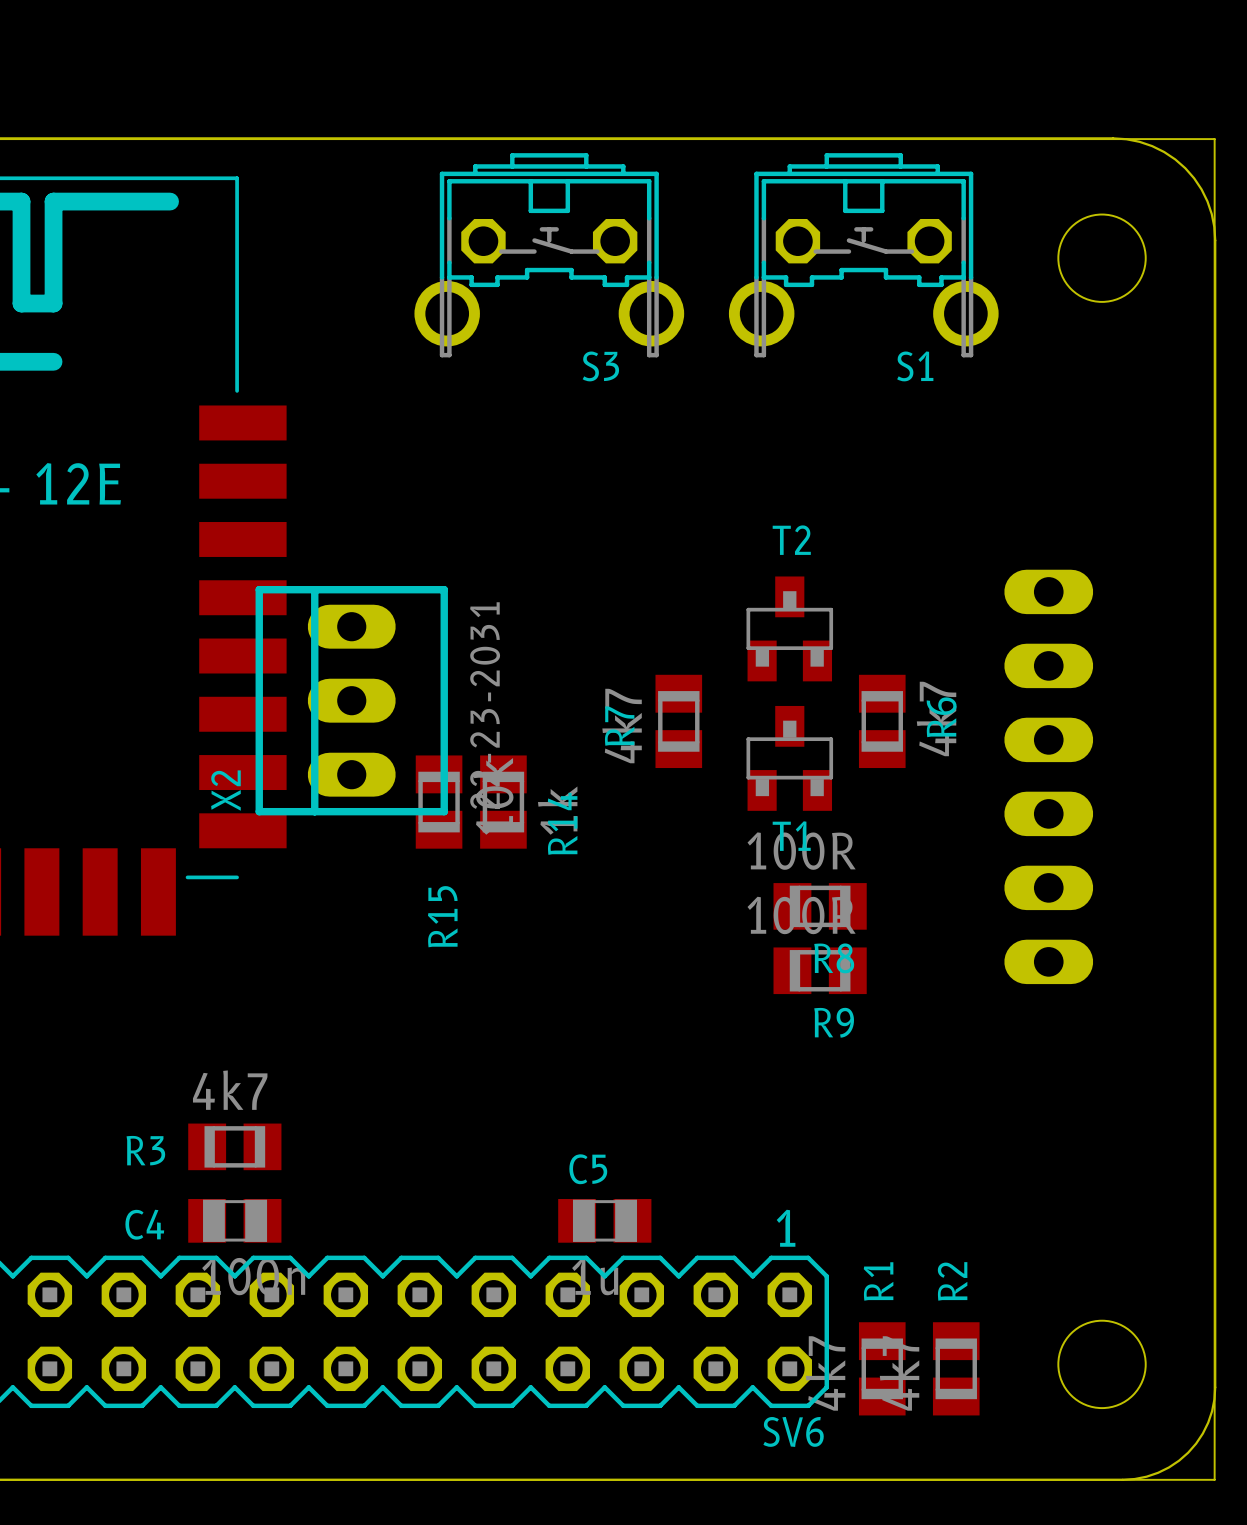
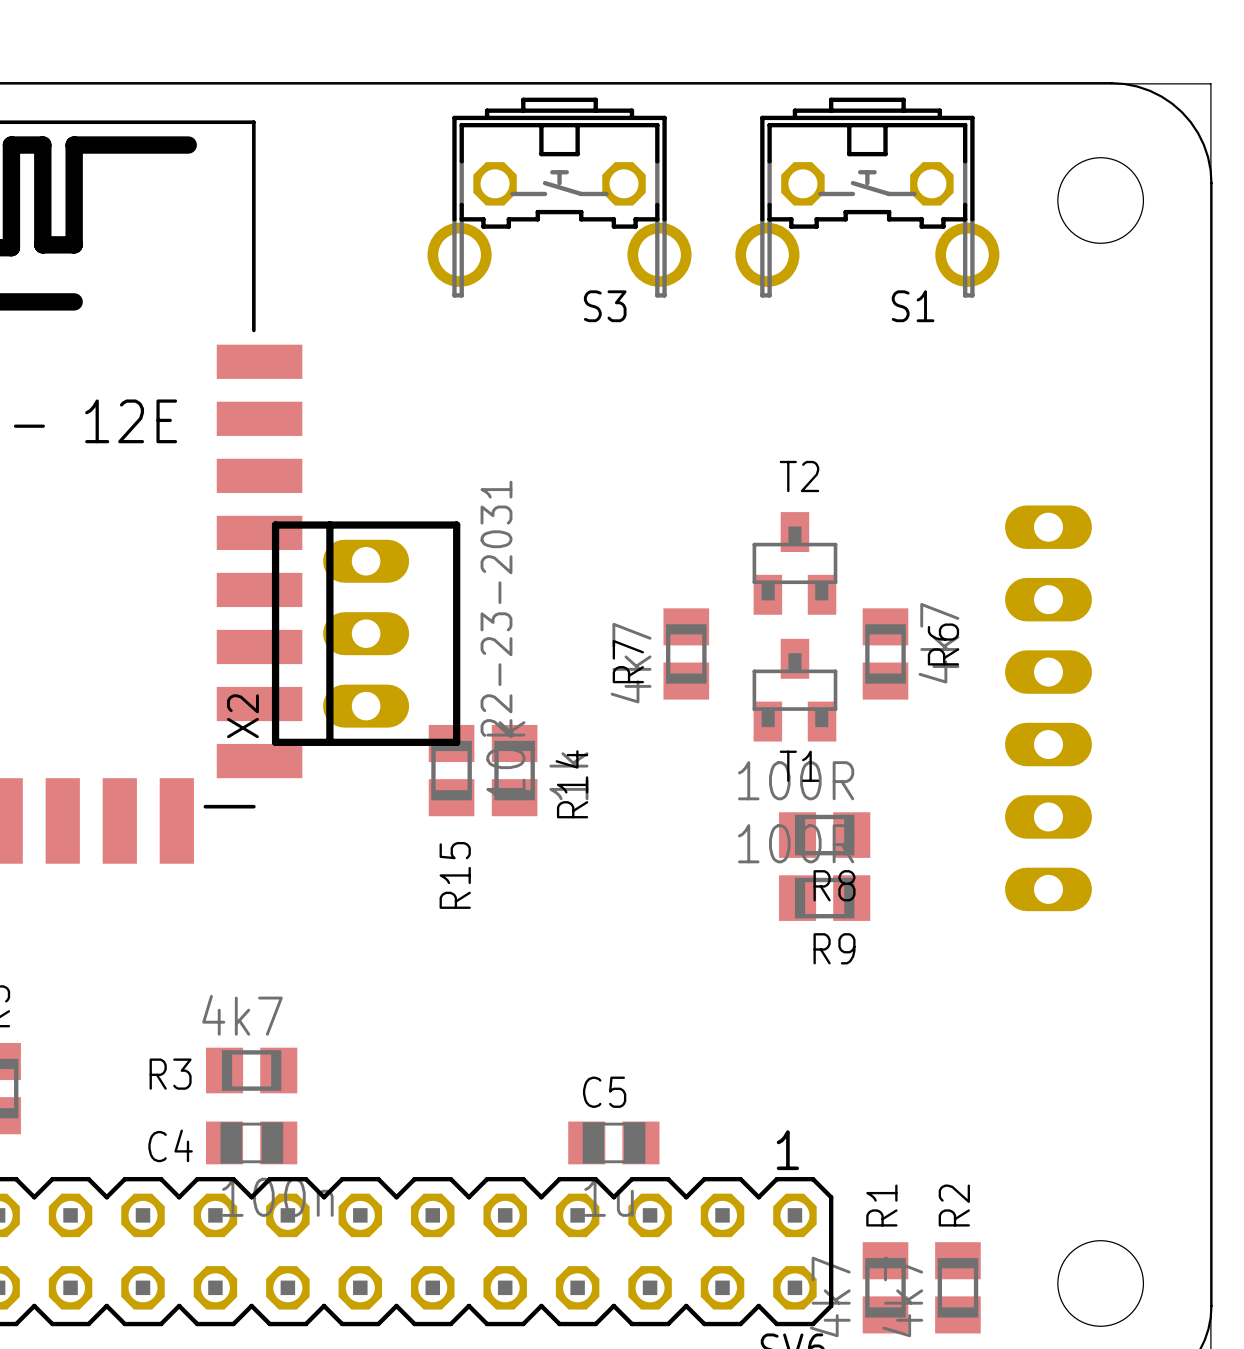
R15 position: (439, 802) -> (451, 770)
R14 position: (503, 802) -> (514, 770)

